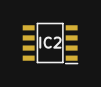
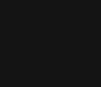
IC2: (50, 43) -> none

